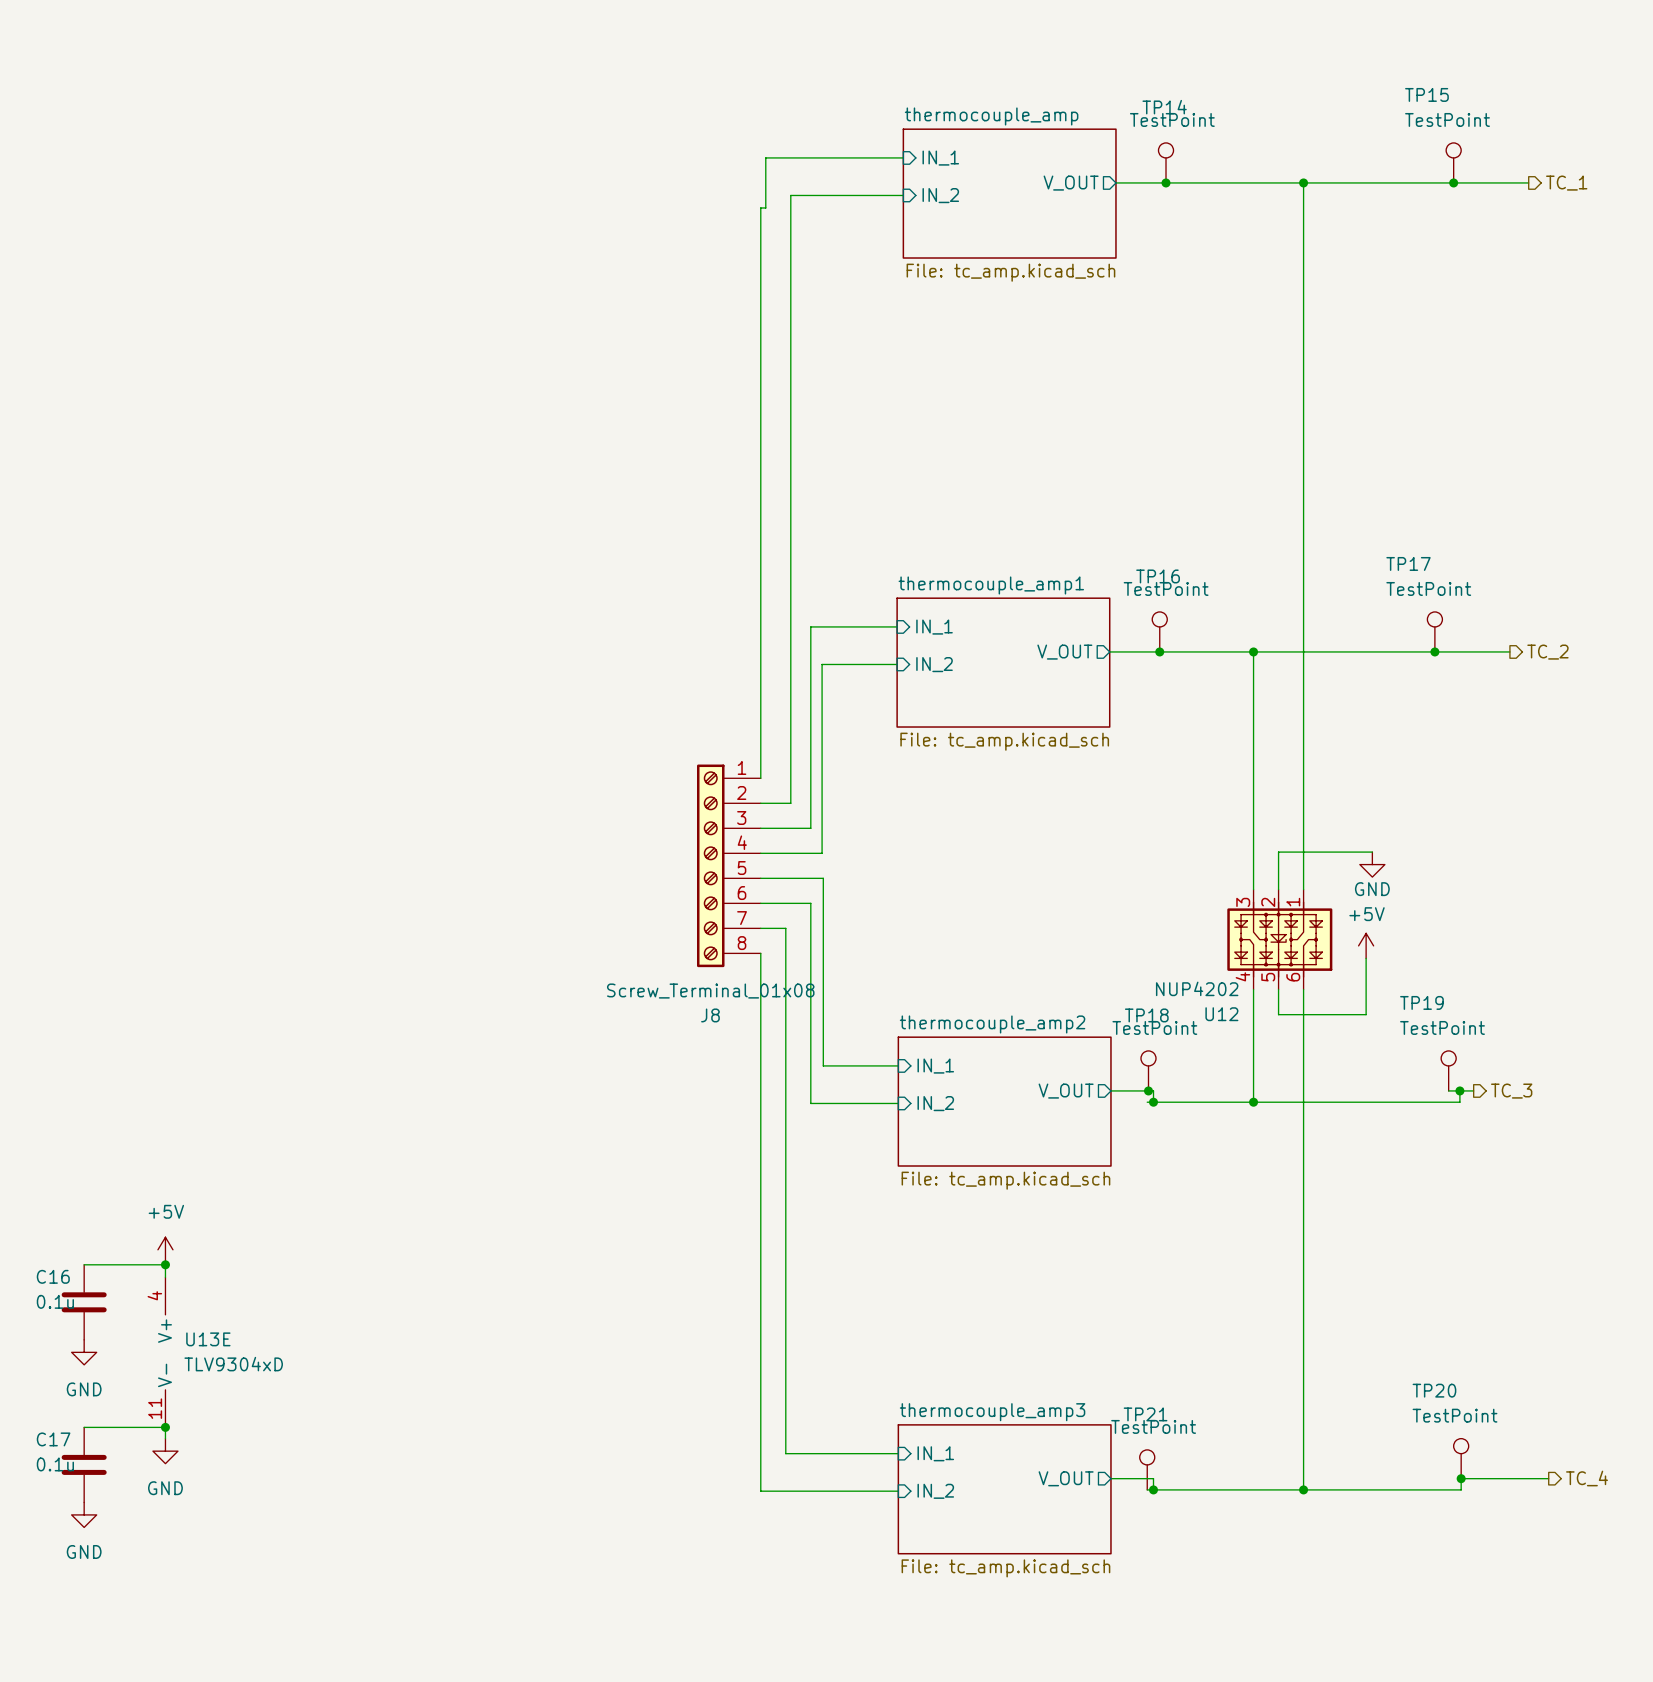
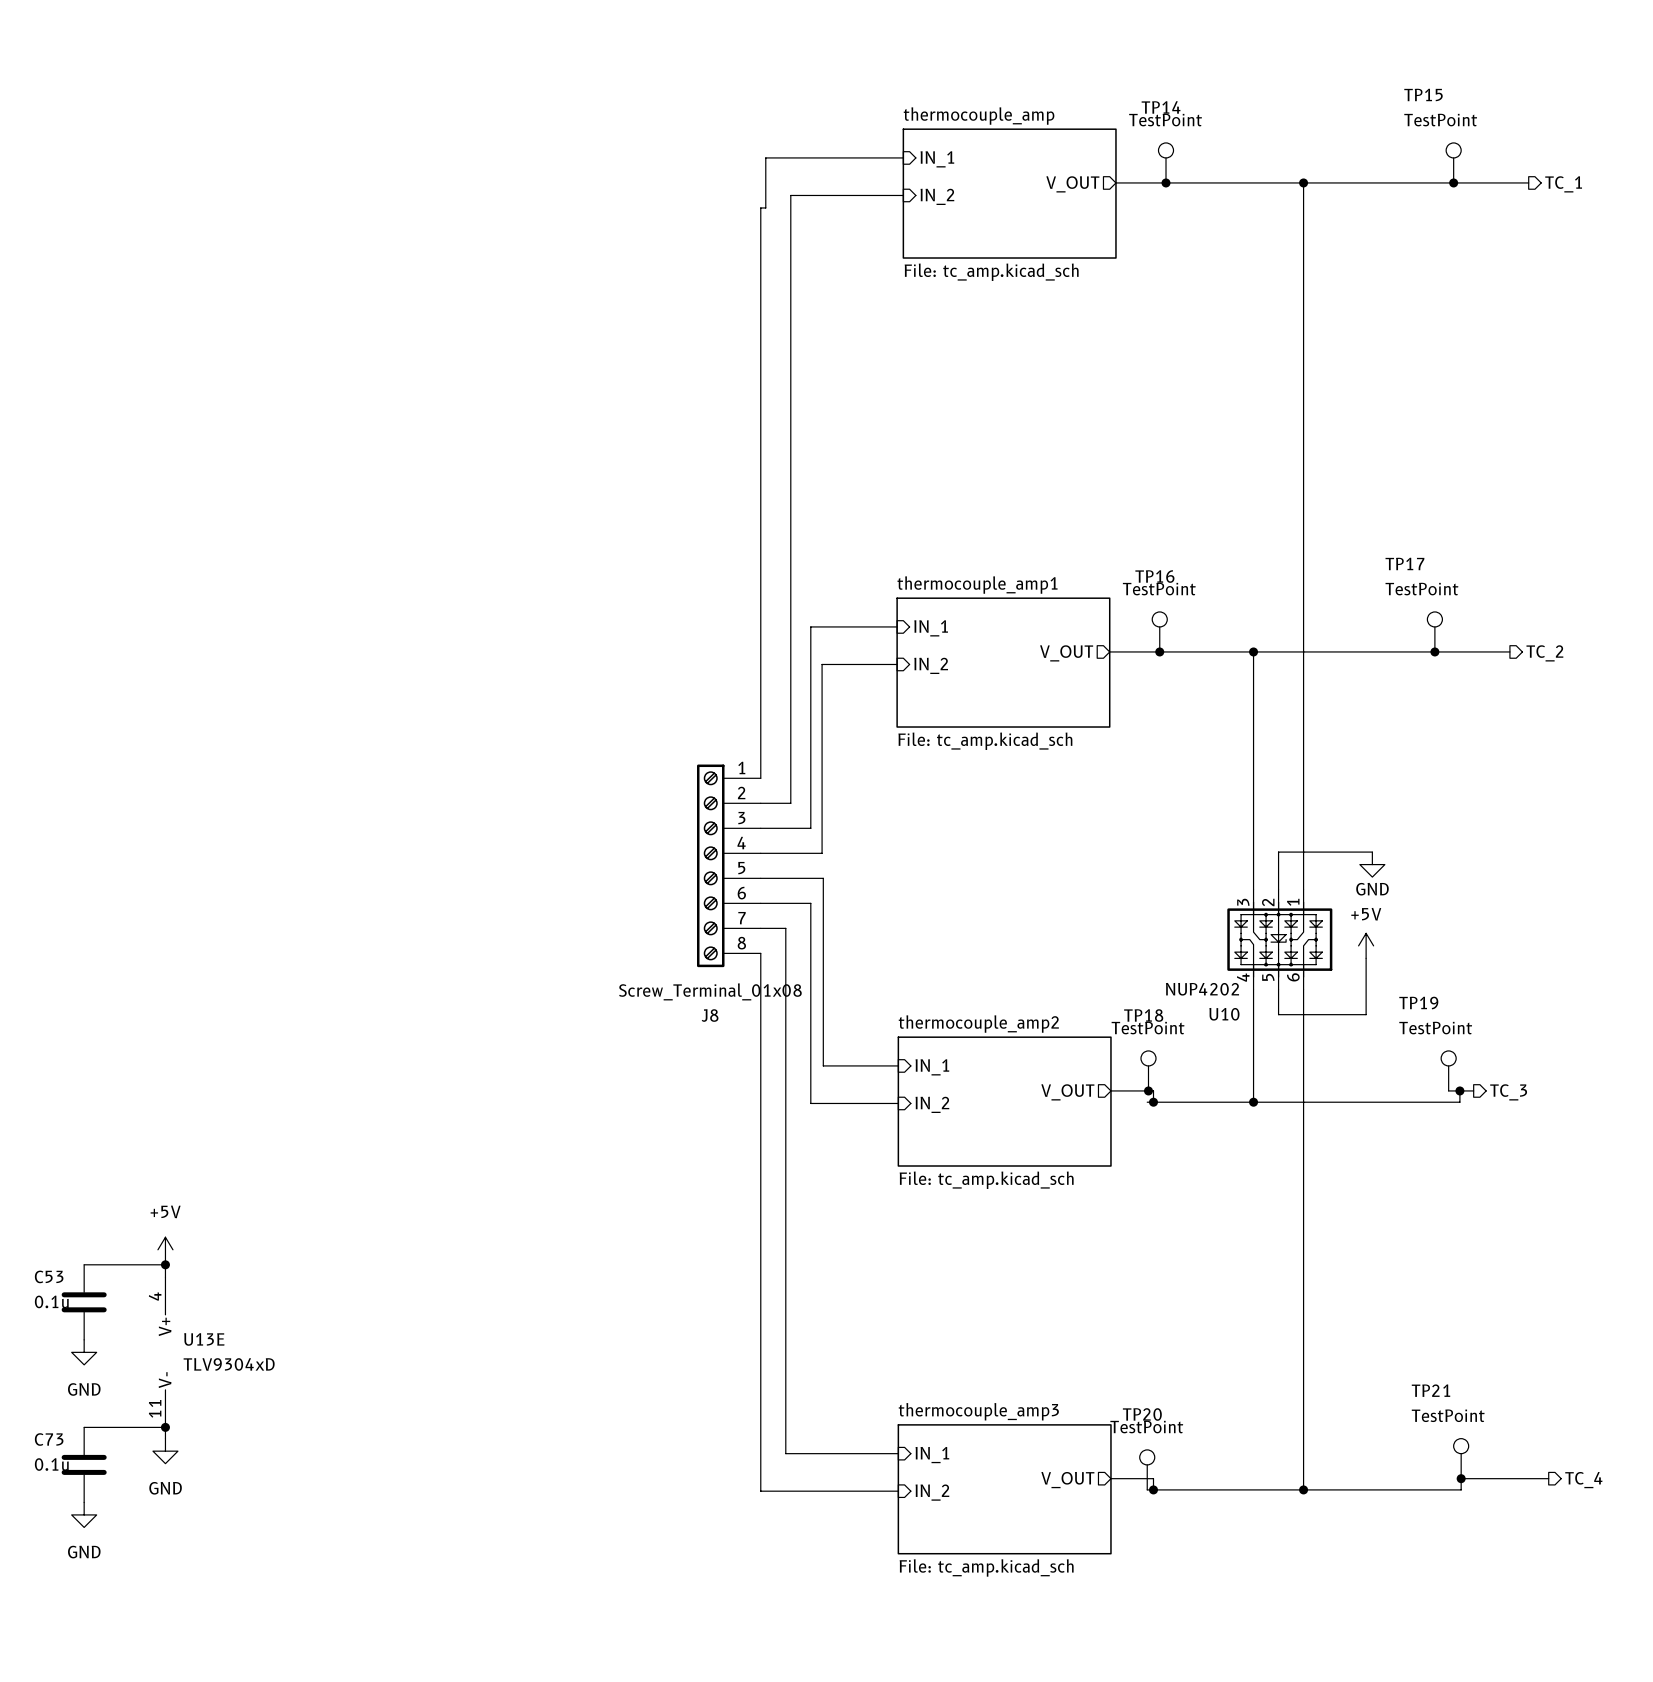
U12 name: U12 (1221, 1014) -> U10 (1224, 1014)
C16 name: C16 (53, 1276) -> C53 (49, 1276)
TP20 name: TP20 (1434, 1390) -> TP21 (1431, 1390)
TP21 name: TP21 (1145, 1414) -> TP20 (1142, 1414)
C17 name: C17 (53, 1439) -> C73 (49, 1439)

